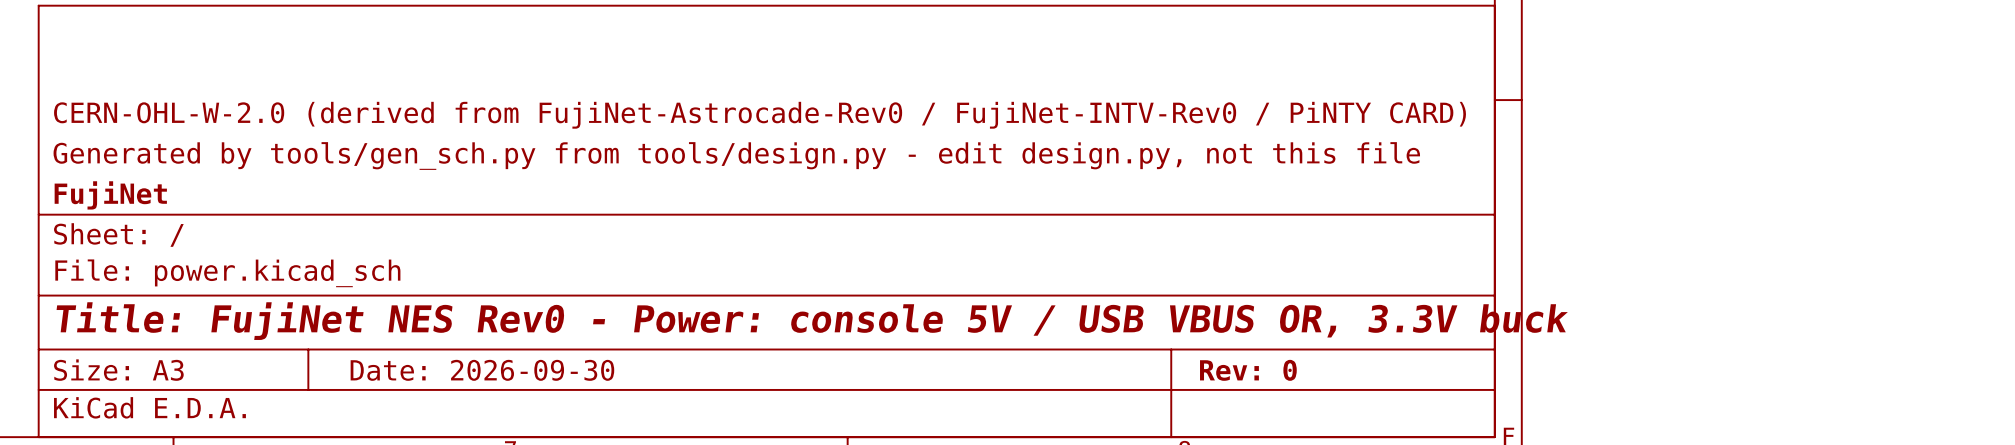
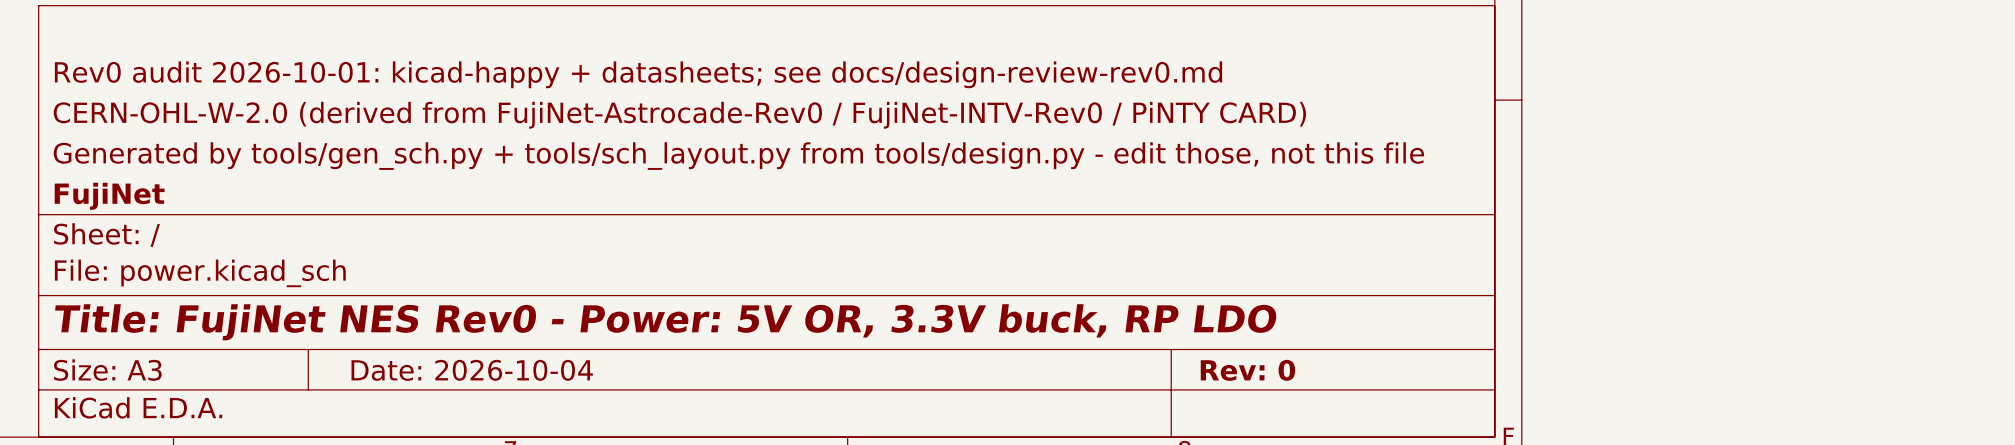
title block: none -> Rev0 audit 2026-10-01: kicad-happy + datasheets; see docs/design-review-rev0.md (638, 74)
title block: Generated by tools/gen_sch.py from tools/design.py - edit design.py, not this file (736, 156) -> Generated by tools/gen_sch.py + tools/sch_layout.py from tools/design.py - edit those, not this file (738, 156)
title block: Title: FujiNet NES Rev0 - Power: console 5V / USB VBUS OR, 3.3V buck (812, 321) -> Title: FujiNet NES Rev0 - Power: 5V OR, 3.3V buck, RP LDO (665, 322)
title block: Date: 2026-09-30 (482, 370) -> Date: 2026-10-04 (472, 370)

